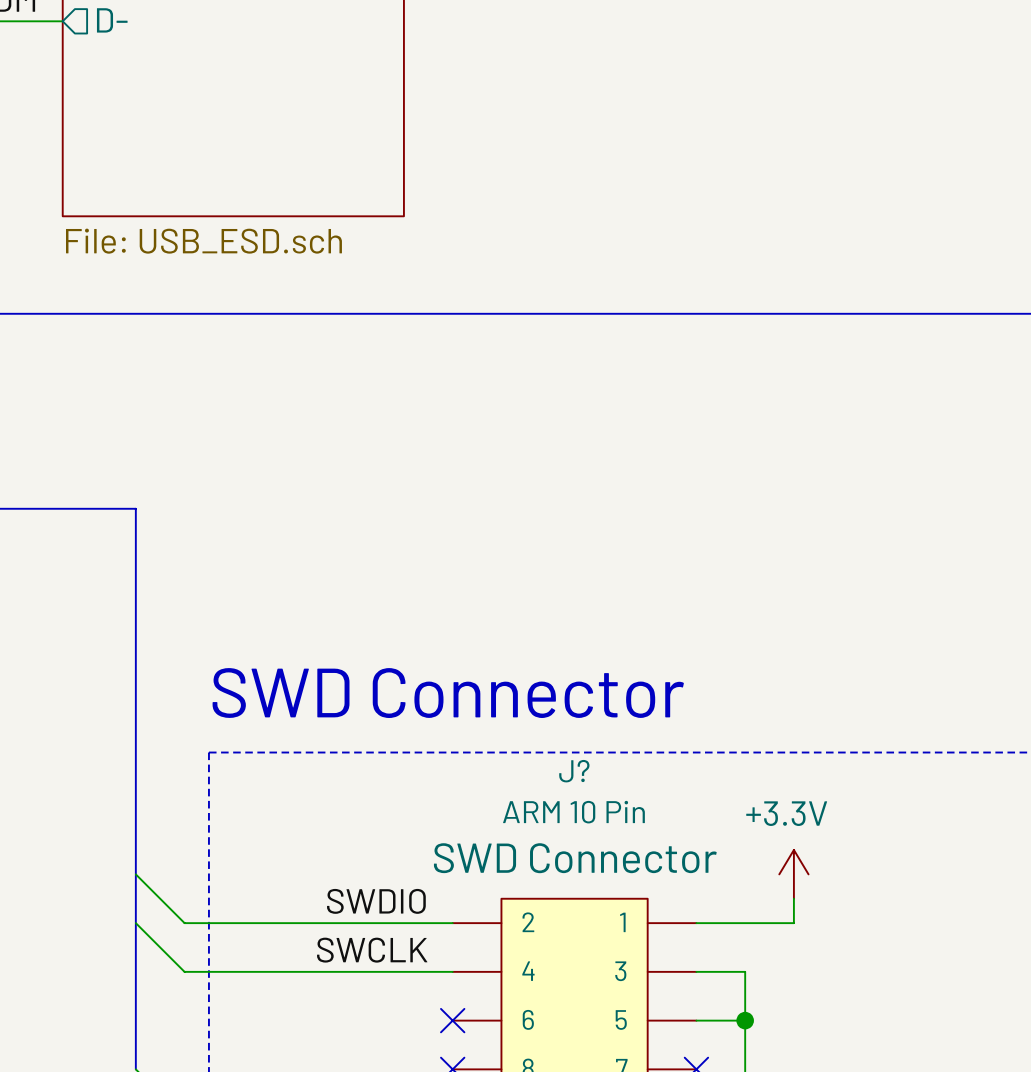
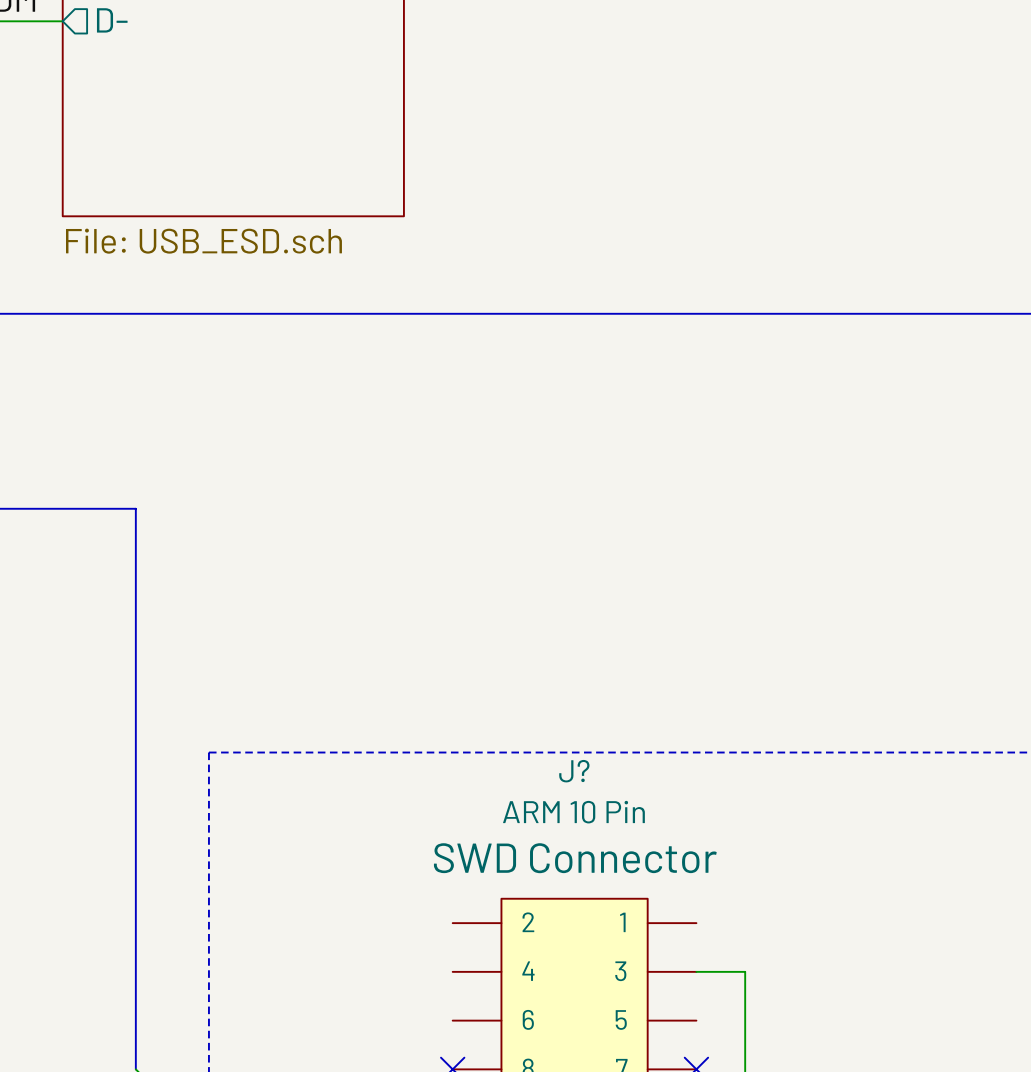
text: SWD Connector (448, 693) -> none
wire: (135, 874) (184, 923) (452, 923) -> none
power symbol: +3.3V (793, 874) -> none
wire: (793, 898) (793, 923) (696, 923) -> none
label: SWDIO (376, 901) -> none
wire: (135, 923) (184, 971) (452, 971) -> none
label: SWCLK (372, 950) -> none
no-connect mark: (452, 1020) -> none
wire: (696, 1020) (745, 1020) -> none
junction: (745, 1020) -> none

